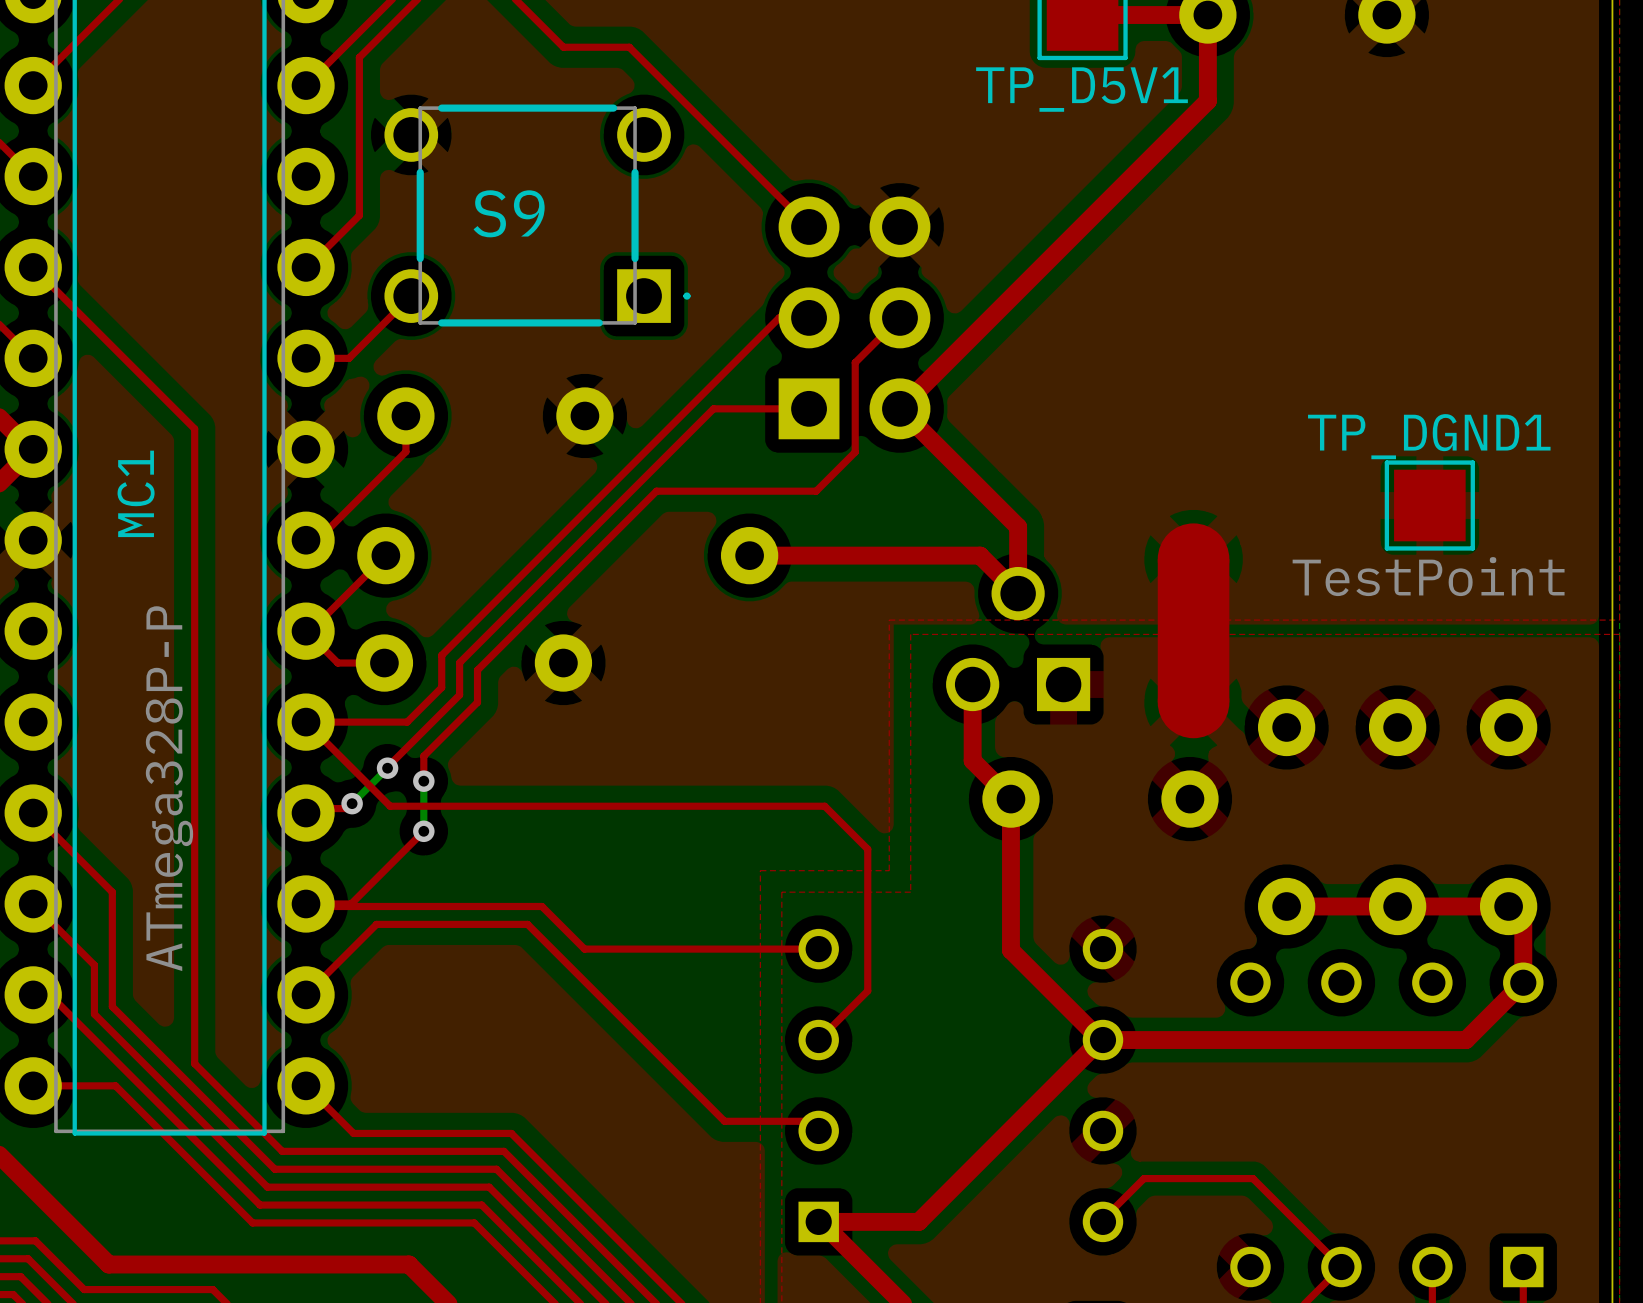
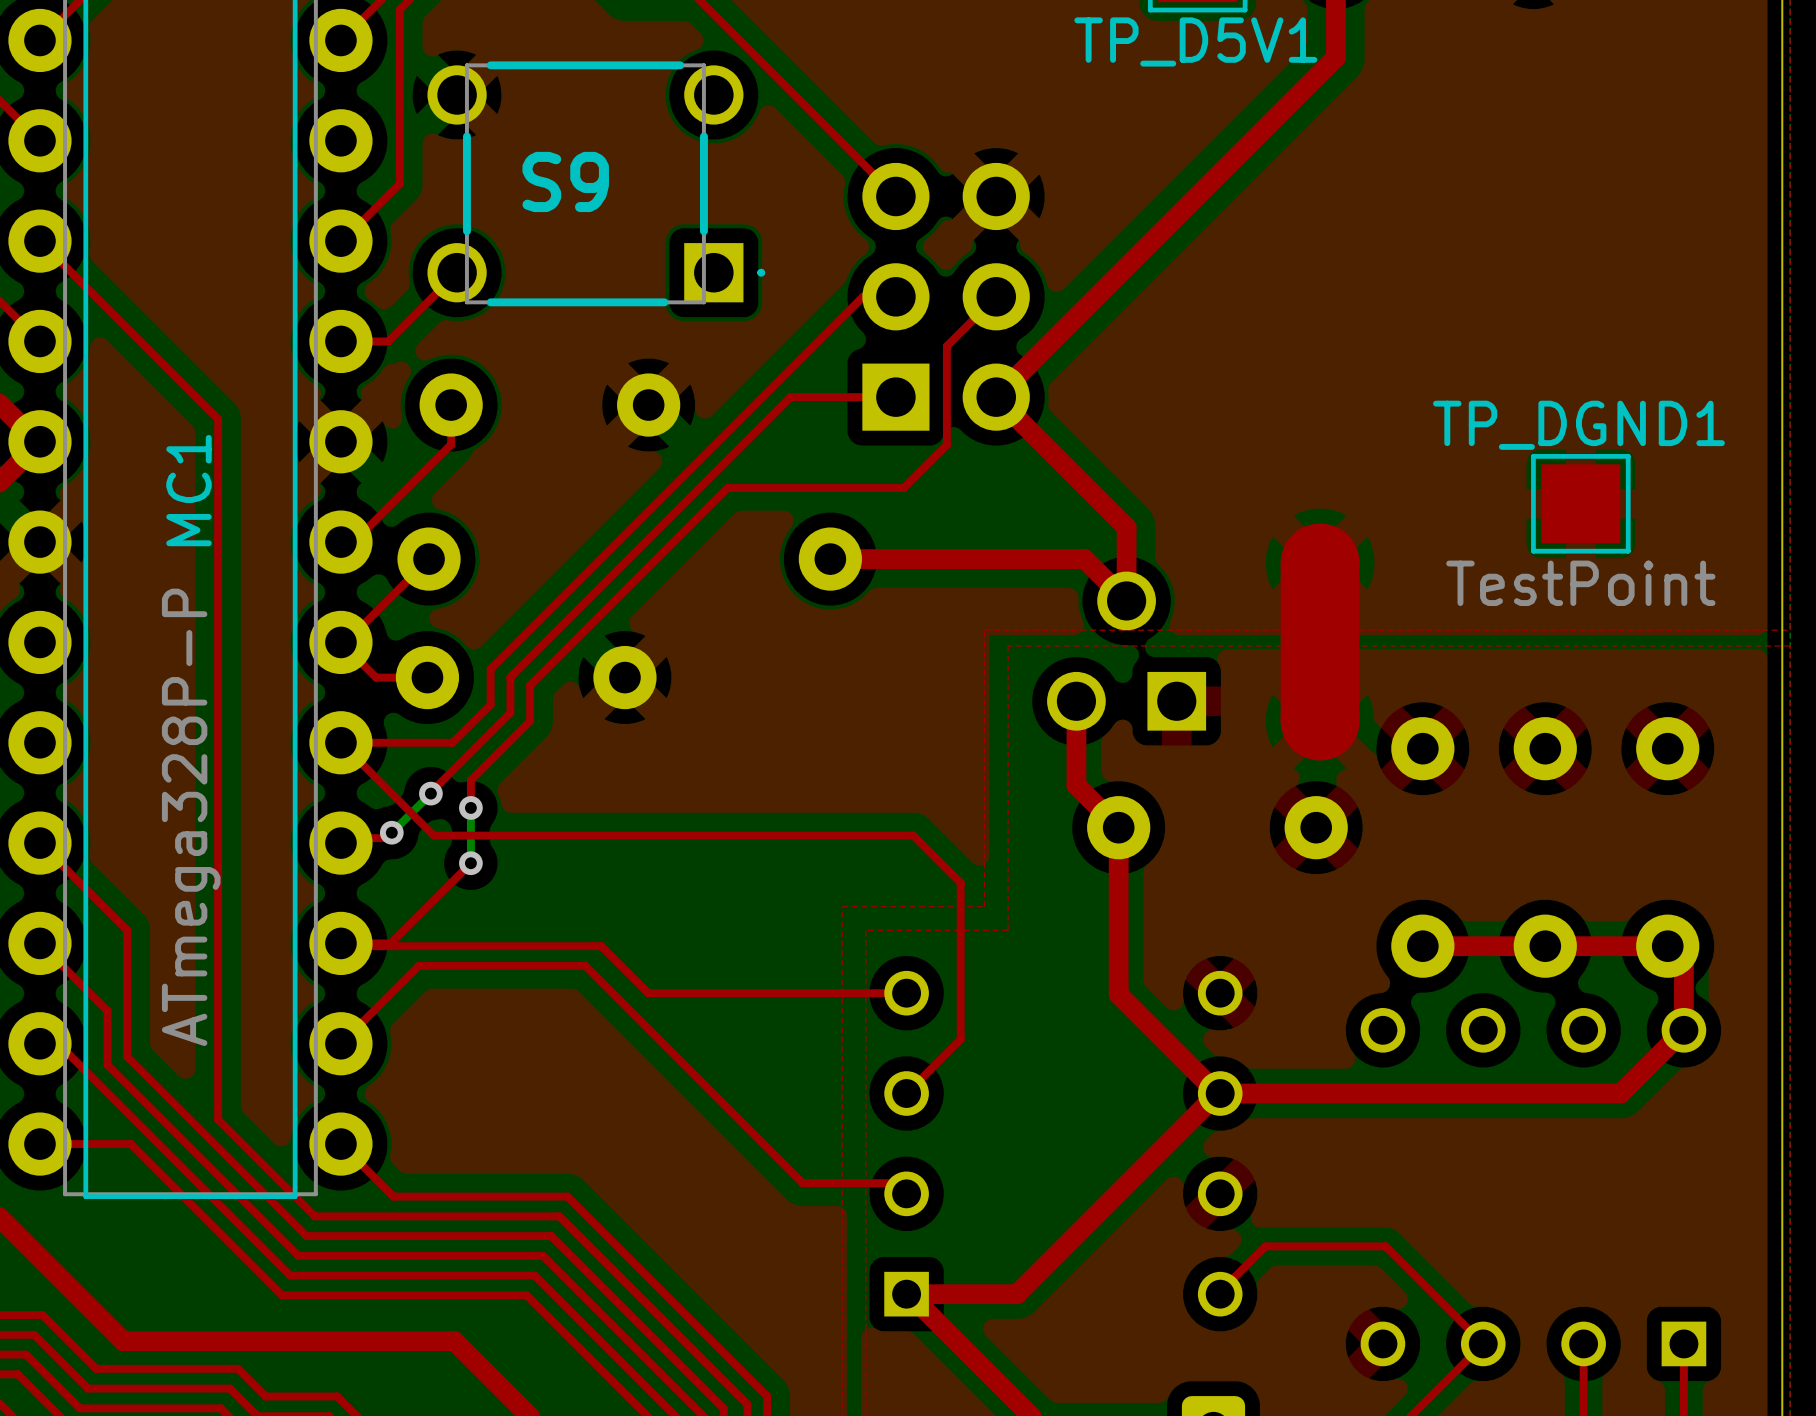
MC1 name position: MC1 (136, 493) -> MC1 (188, 490)

